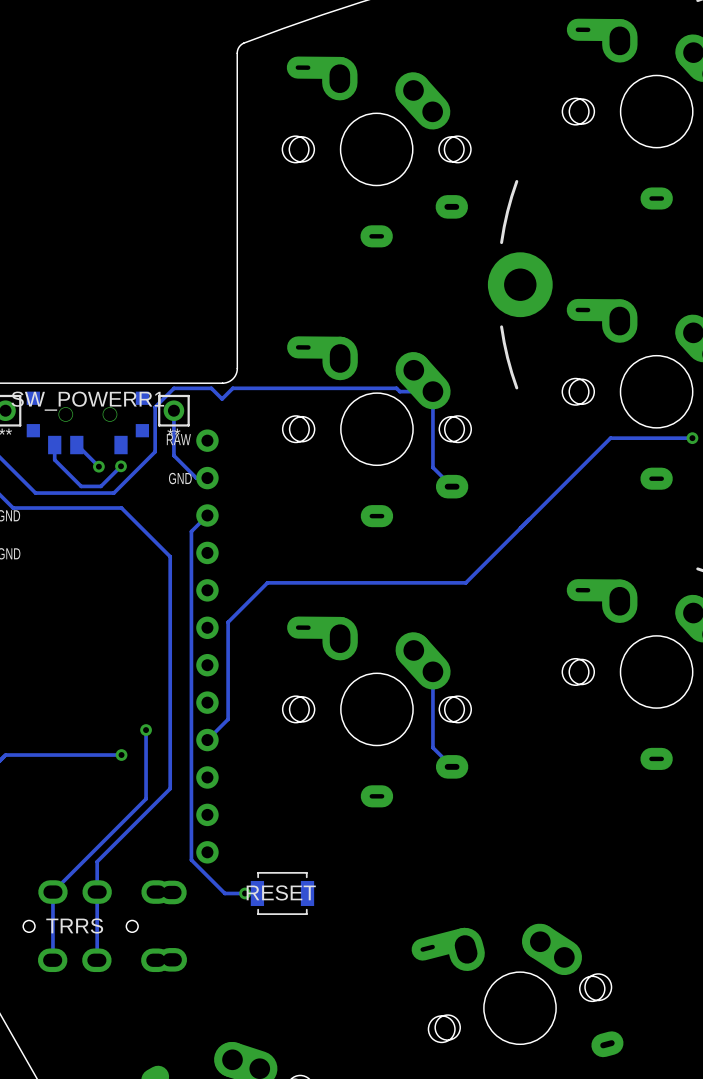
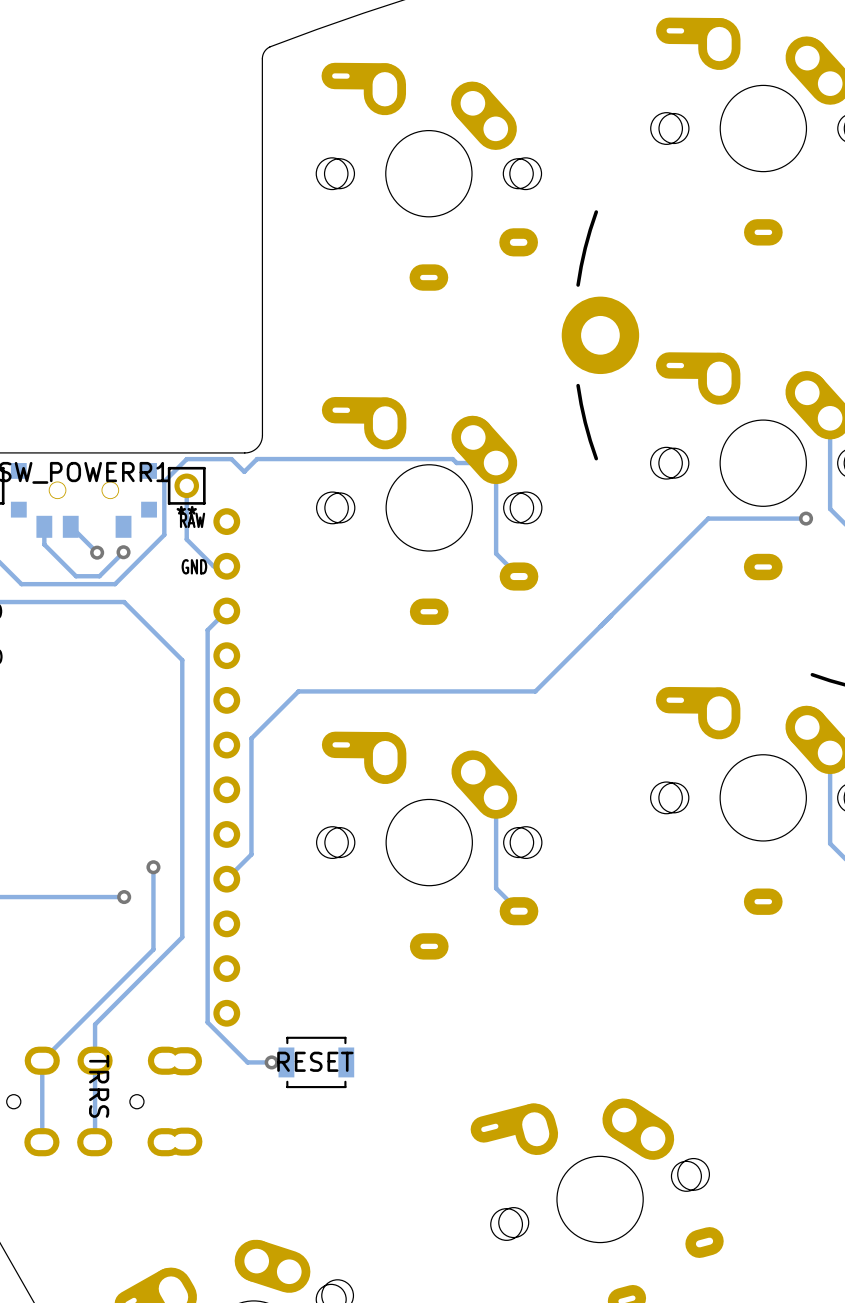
part text rotation: 0° (74, 925) -> 90° clockwise (99, 1086)

